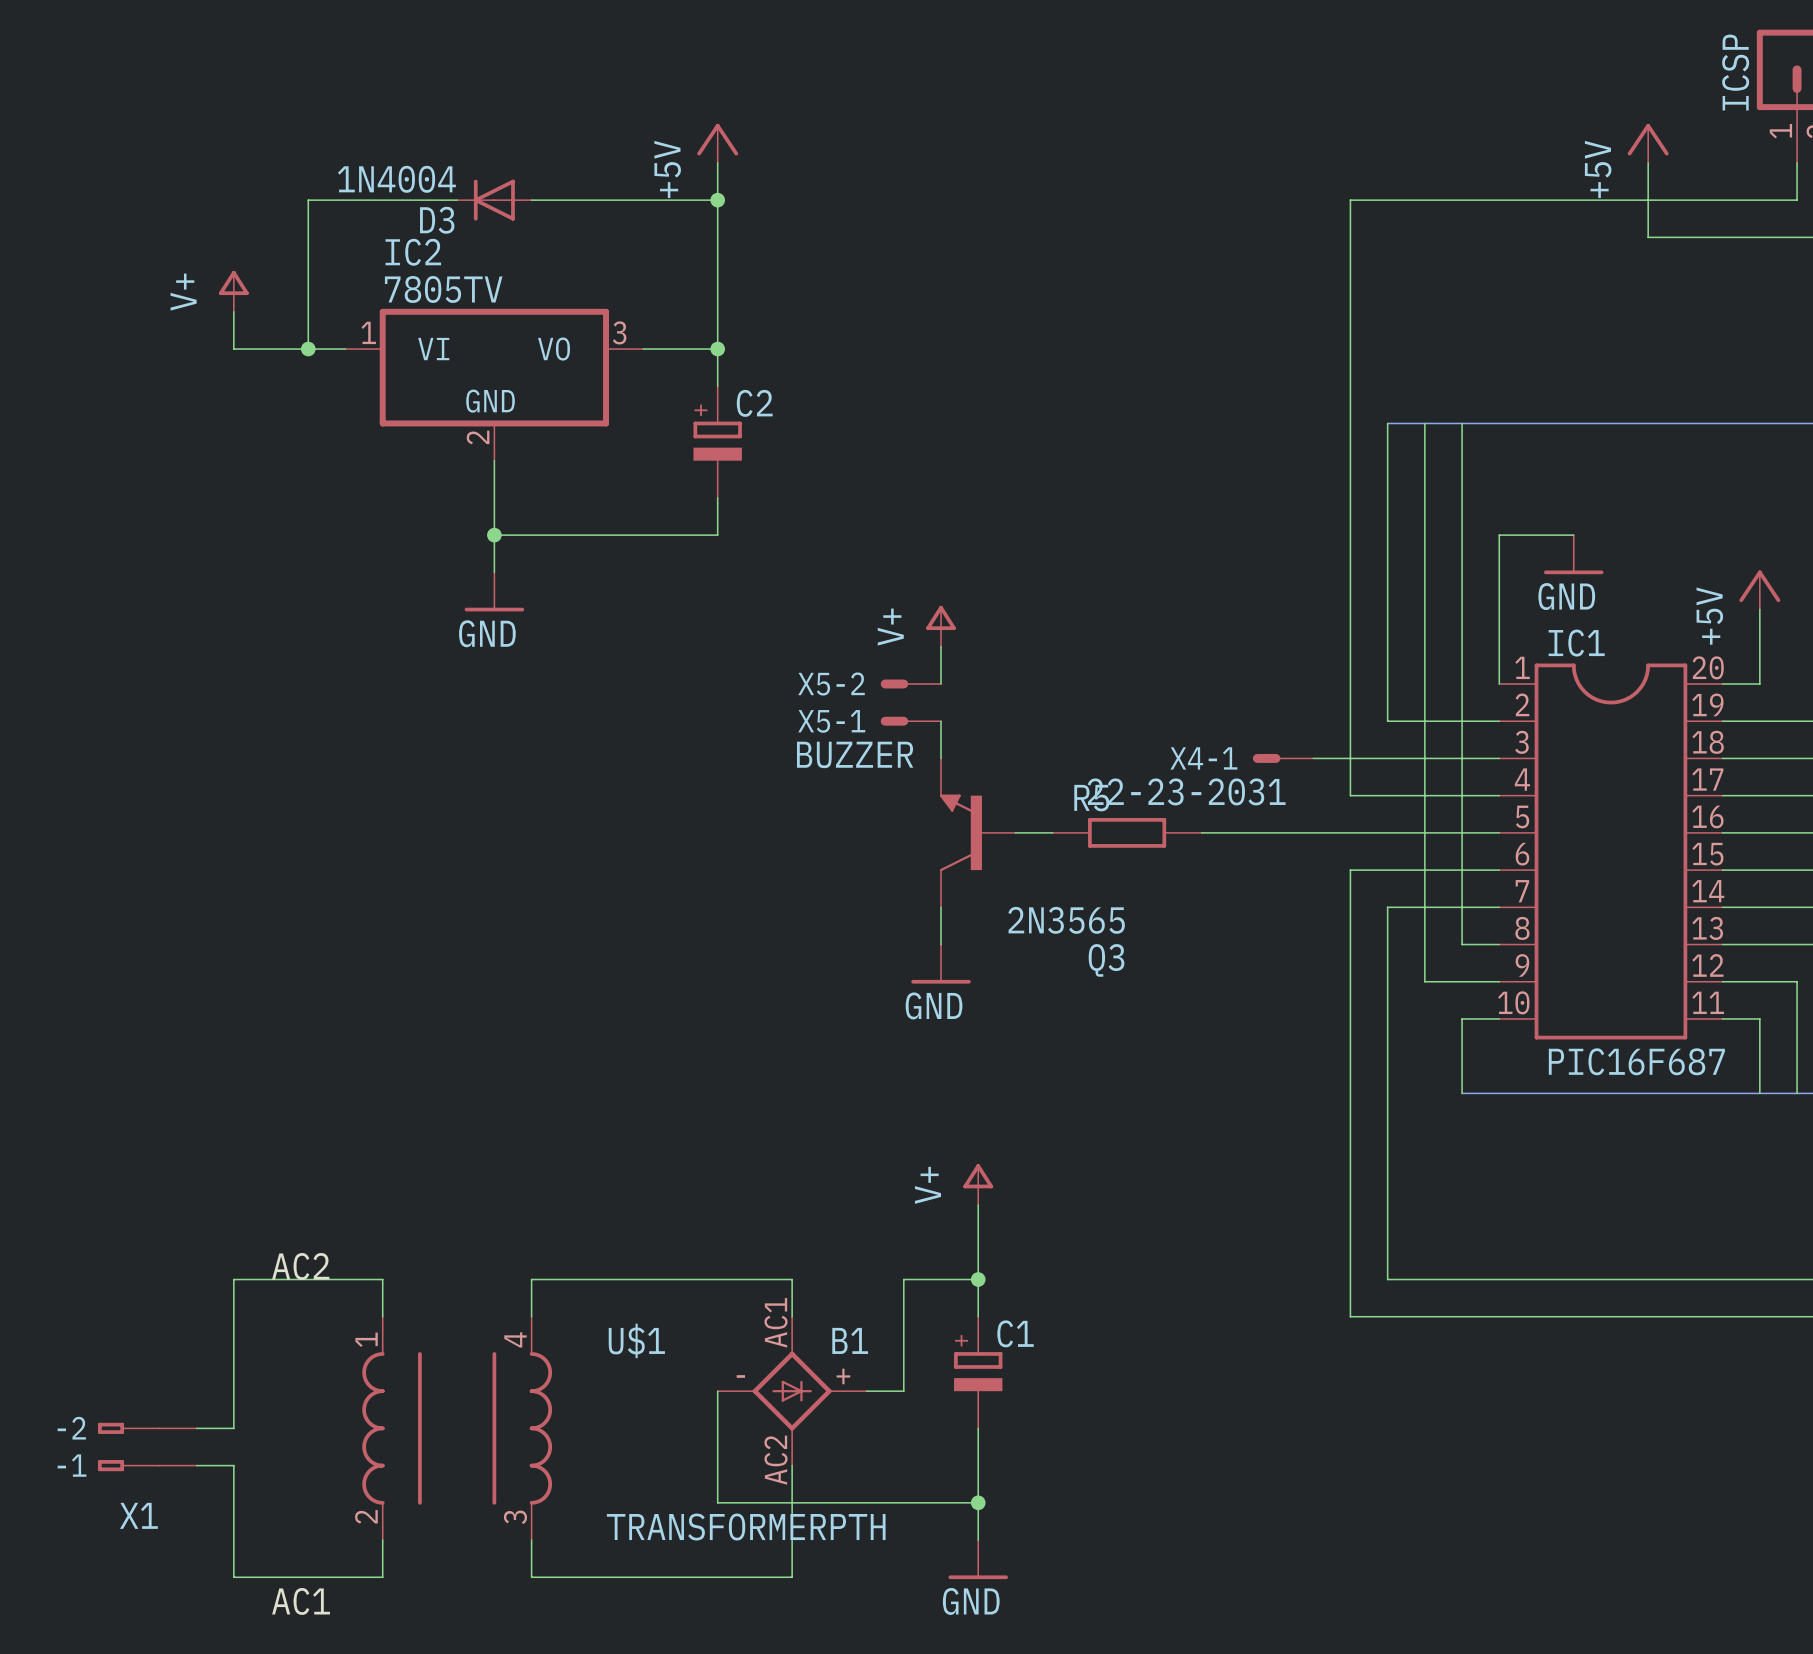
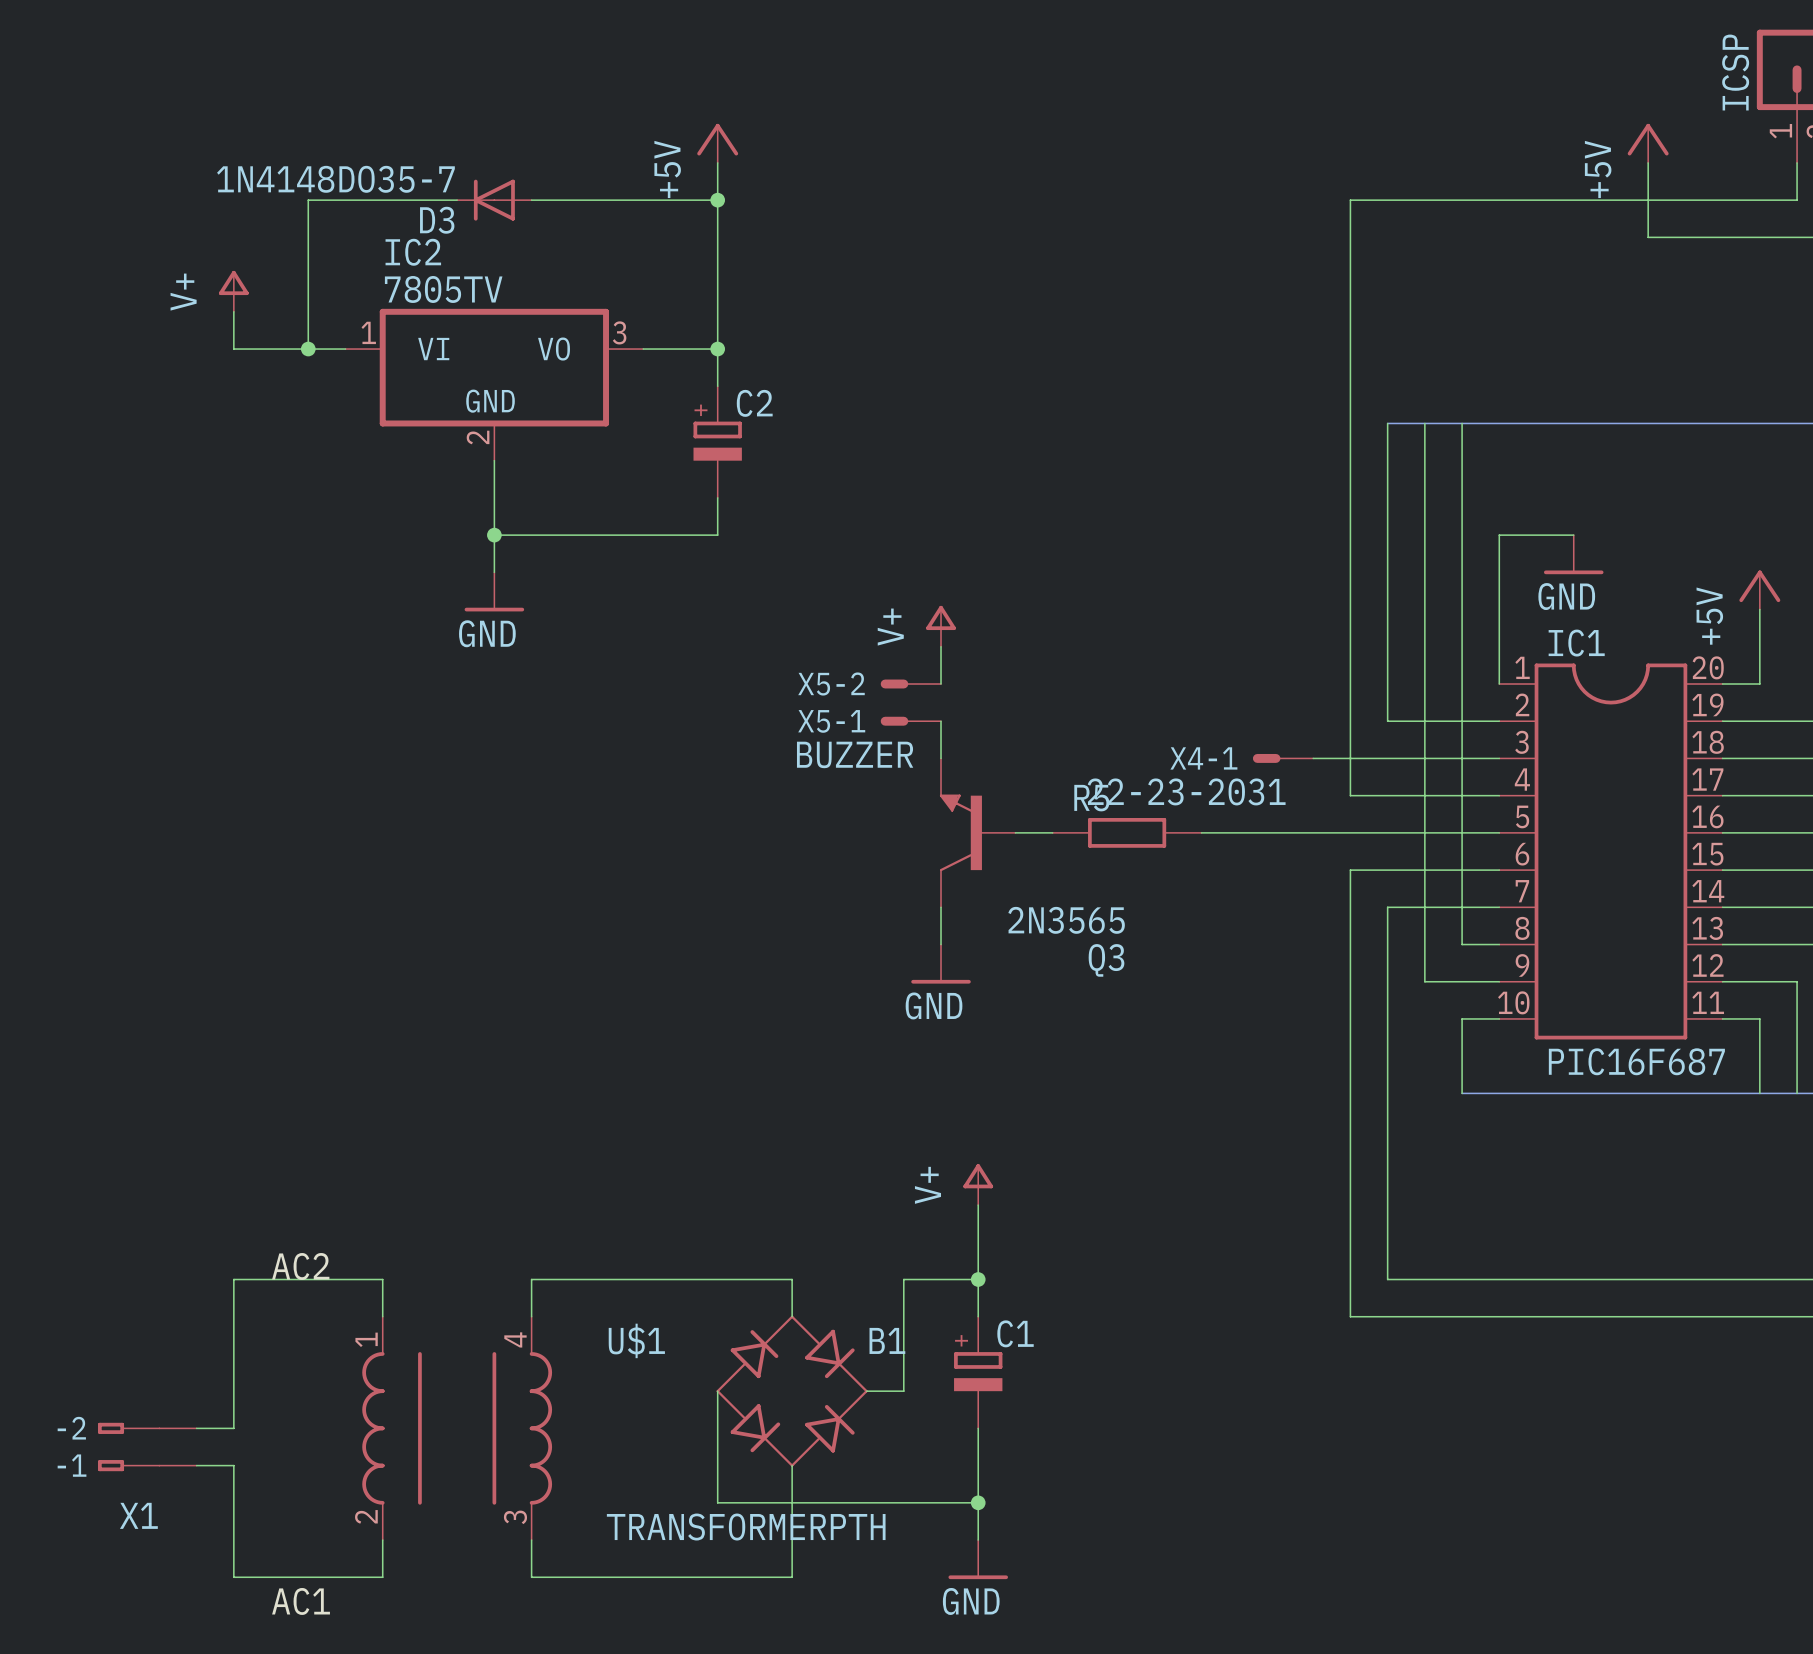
D3 value: 1N4004 (396, 179) -> 1N4148DO35-7 (335, 179)
B1 symbol: [717, 1316, 867, 1466] -> [716, 1315, 868, 1467]
B1 name position: B1 (850, 1340) -> B1 (887, 1340)

